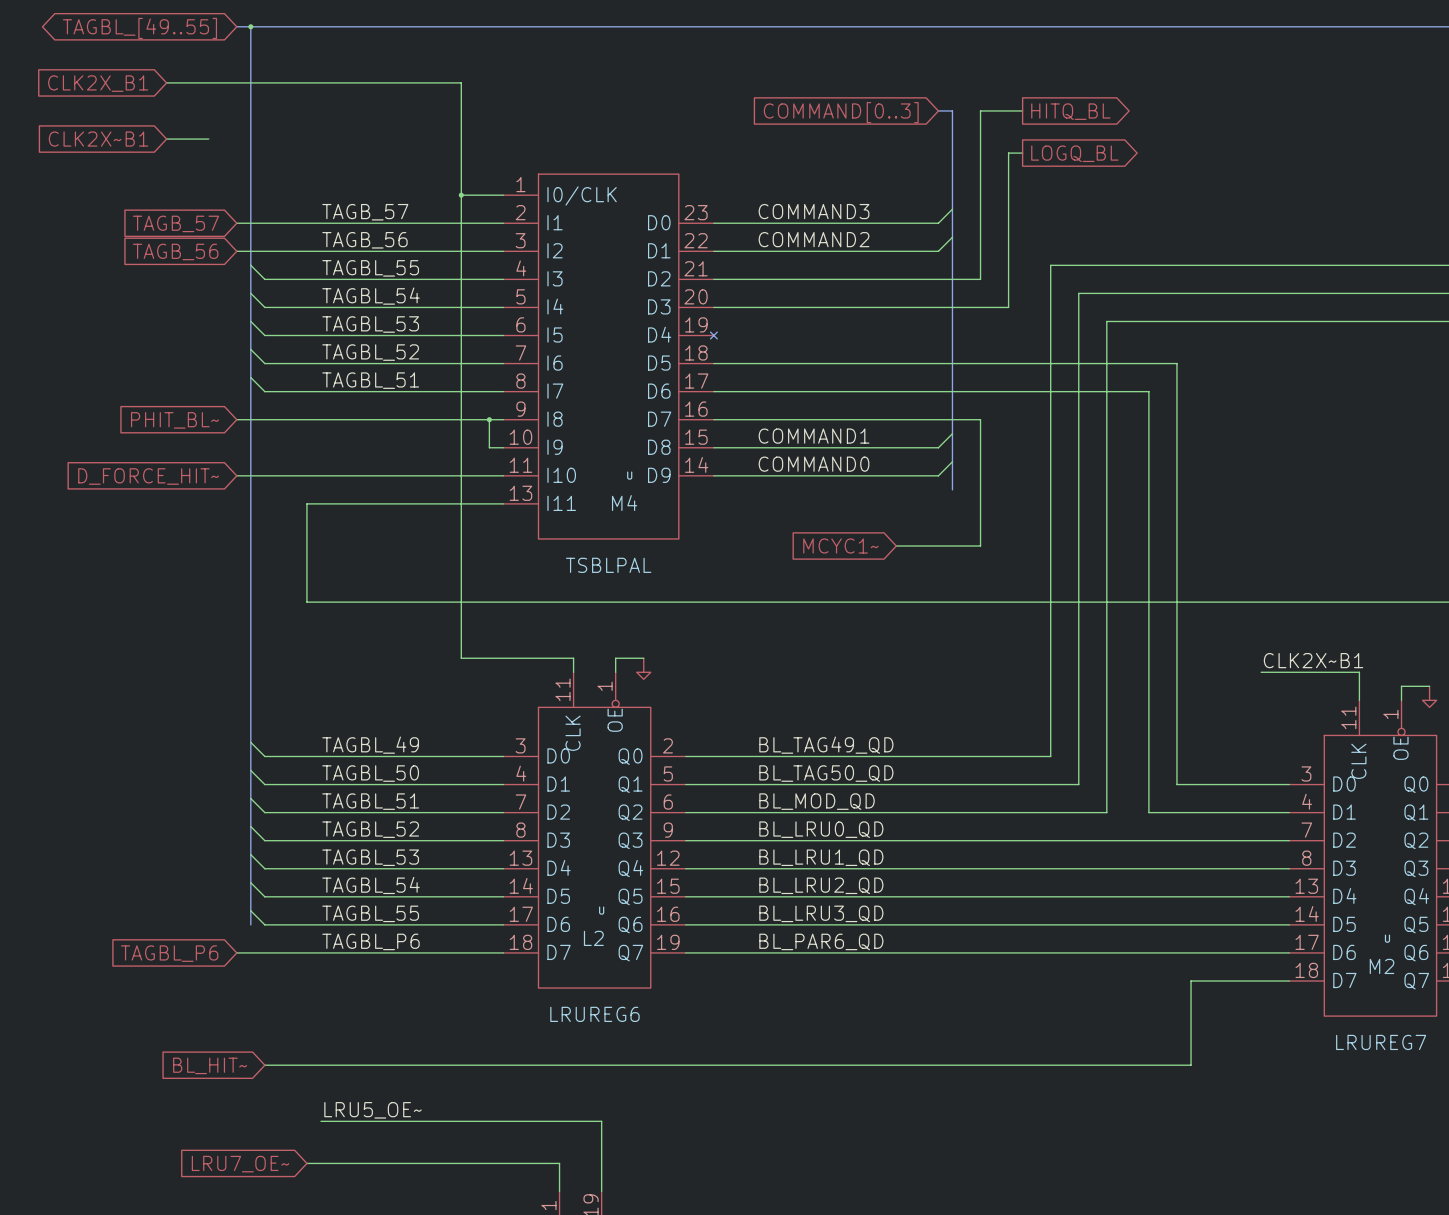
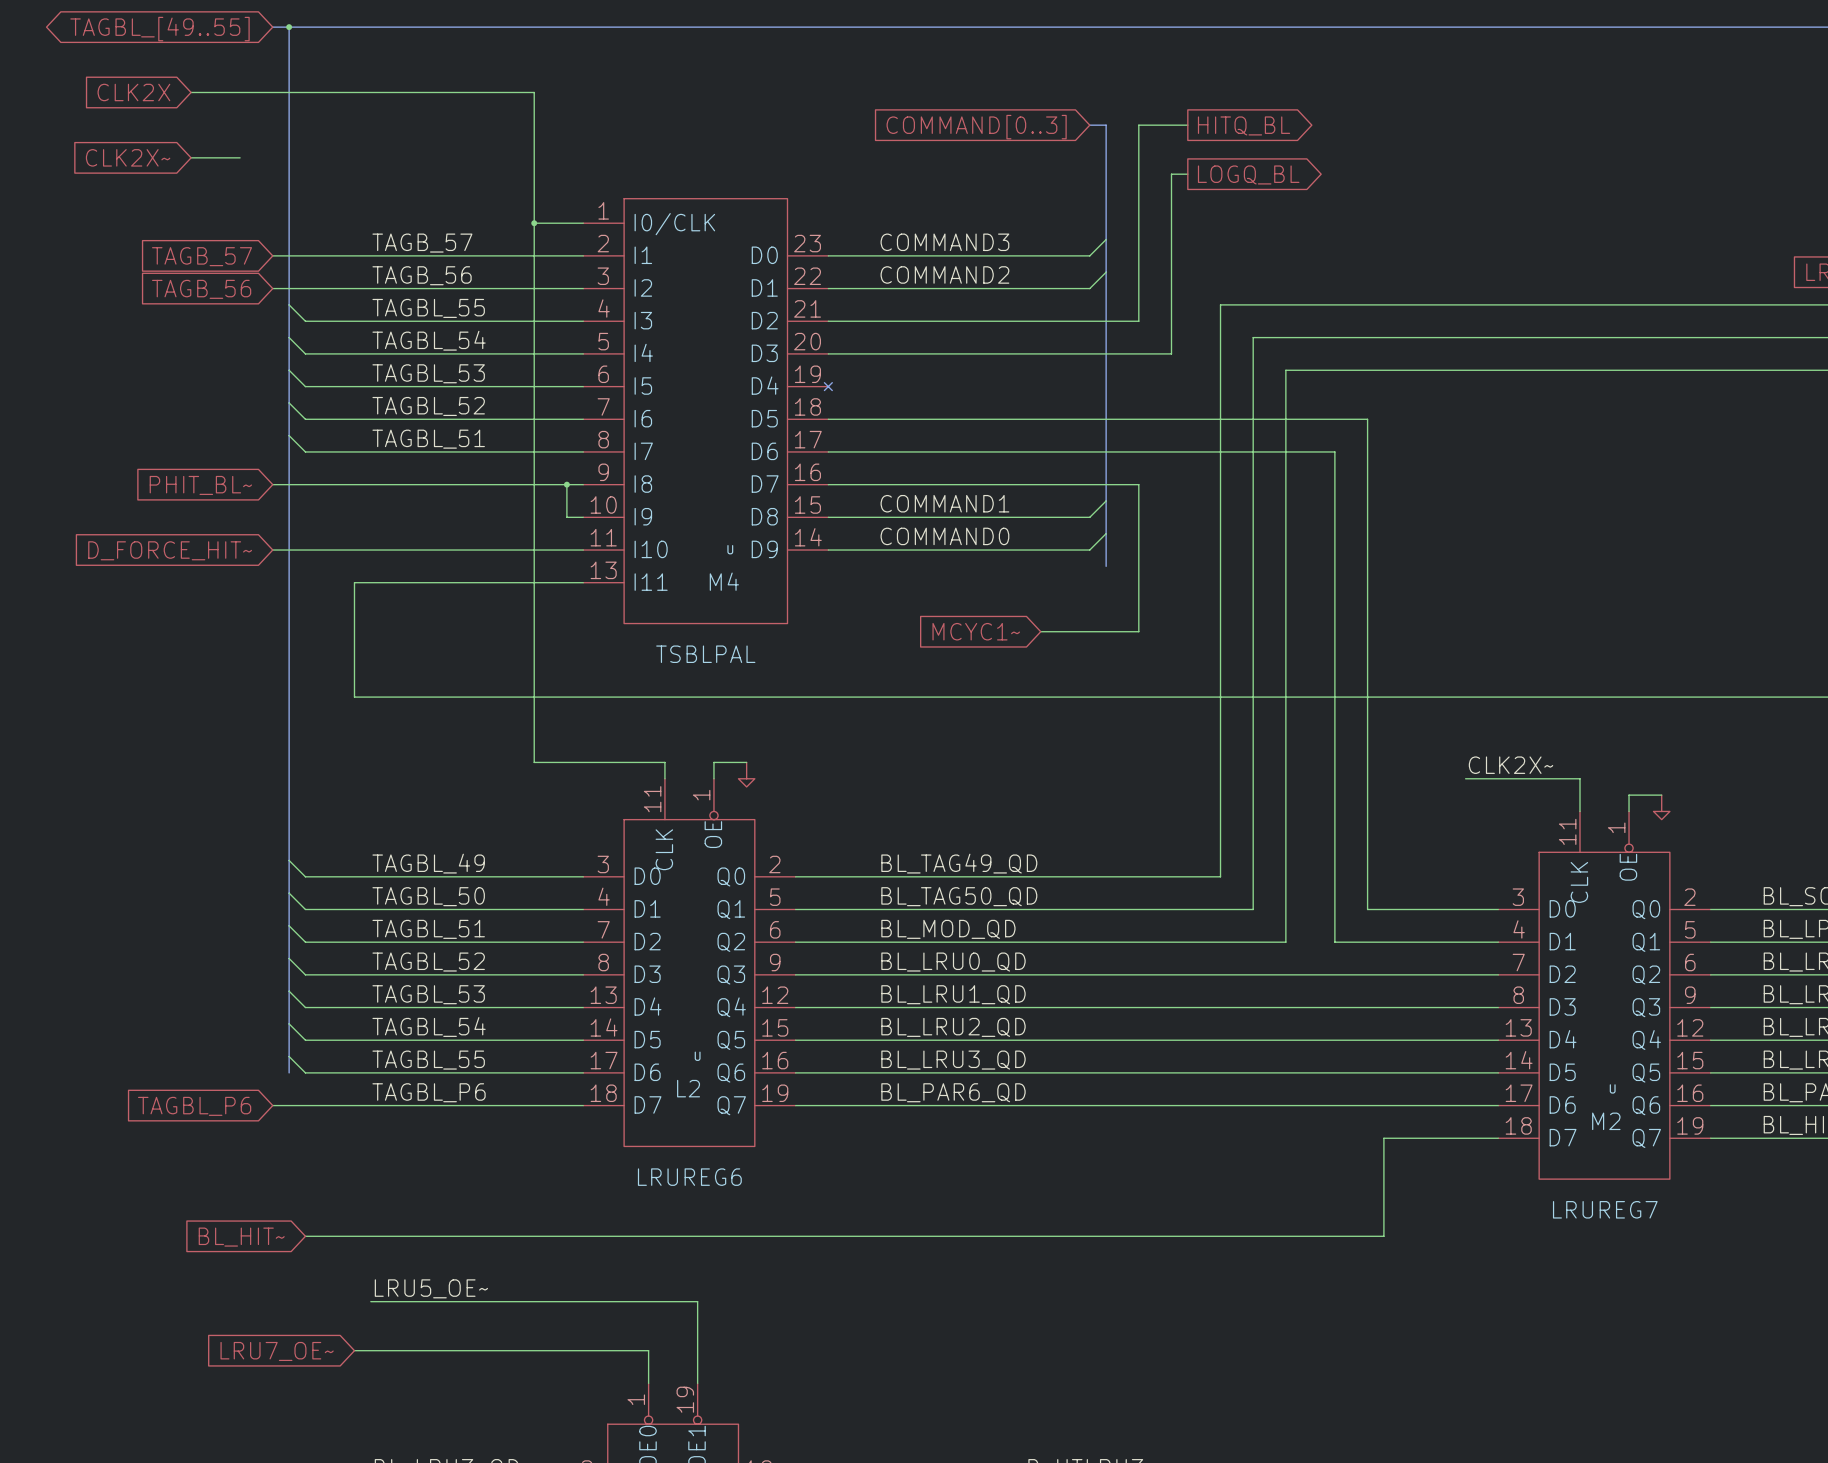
global label: CLK2X_B1 (98, 83) -> CLK2X (133, 92)
global label: CLK2X~B1 (98, 139) -> CLK2X~ (128, 157)
label: CLK2X~B1 (1313, 660) -> CLK2X~ (1511, 765)

